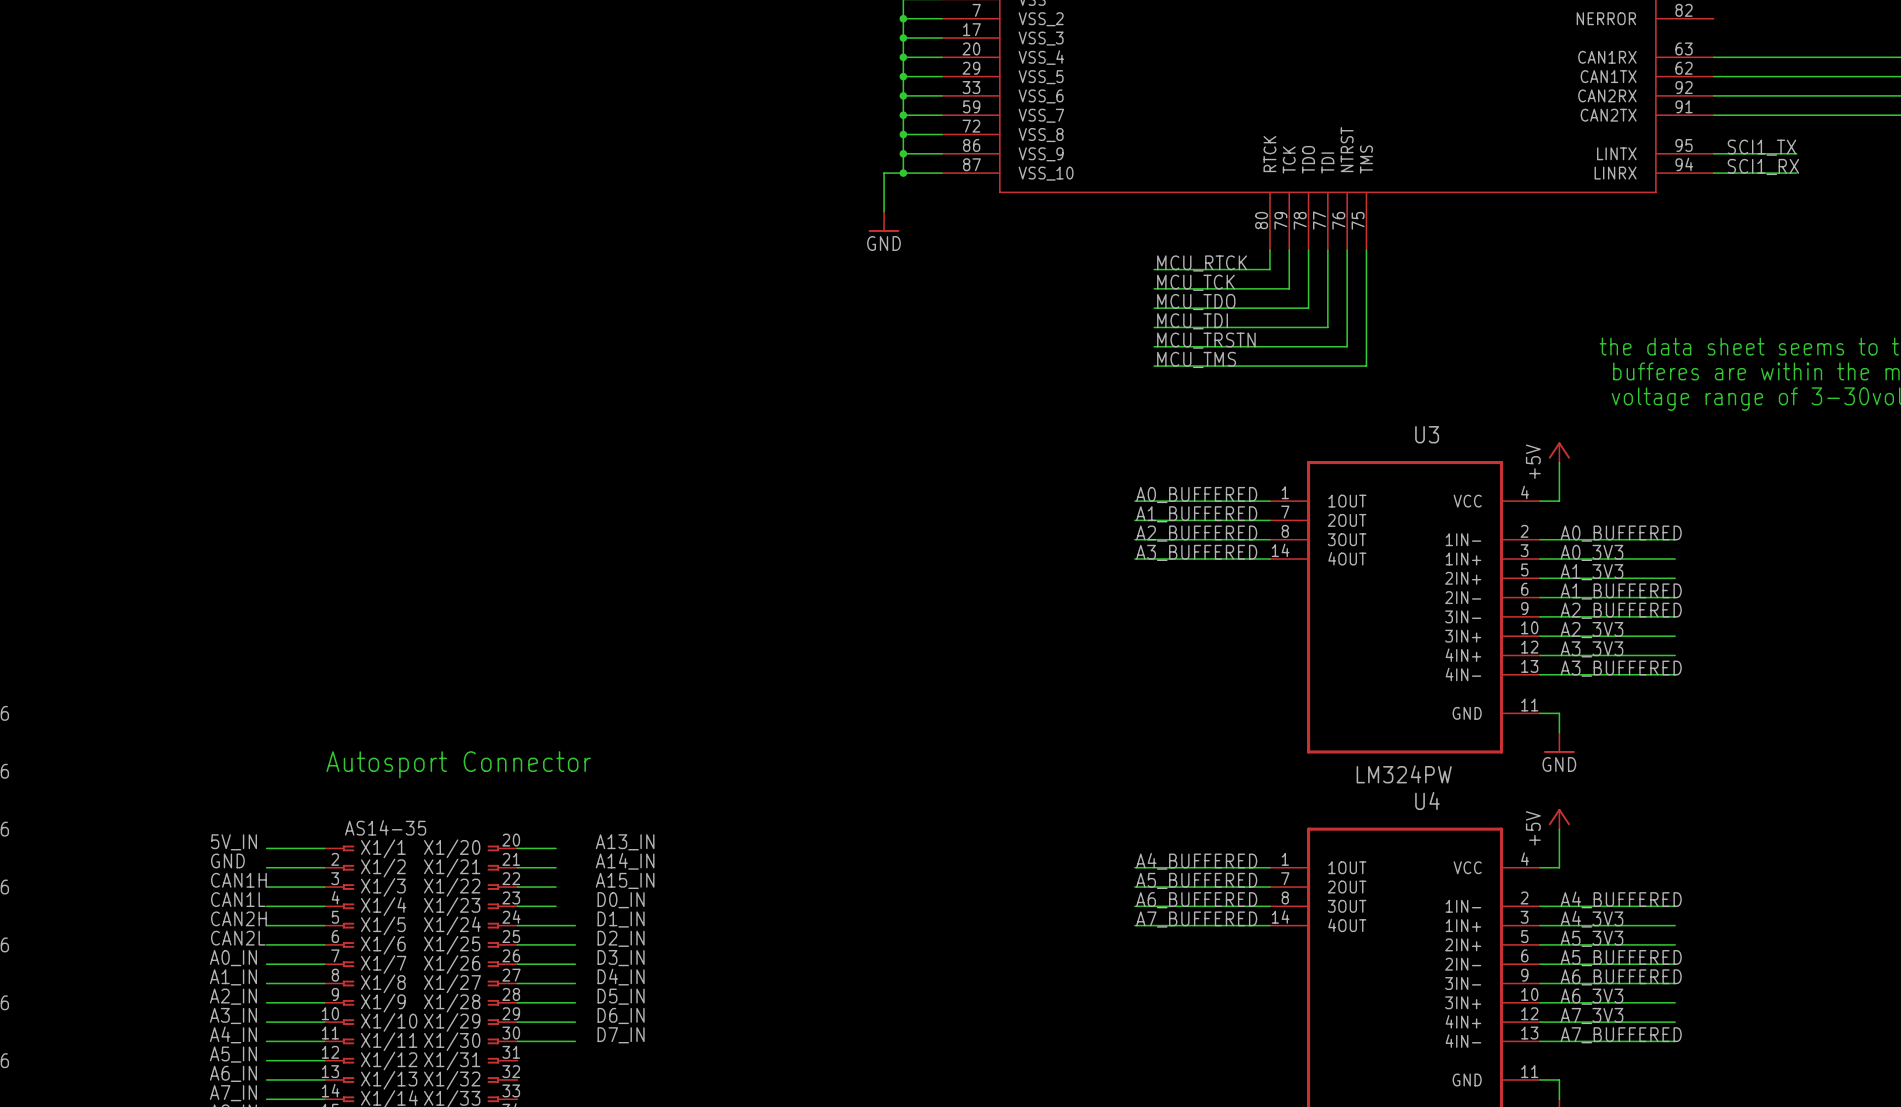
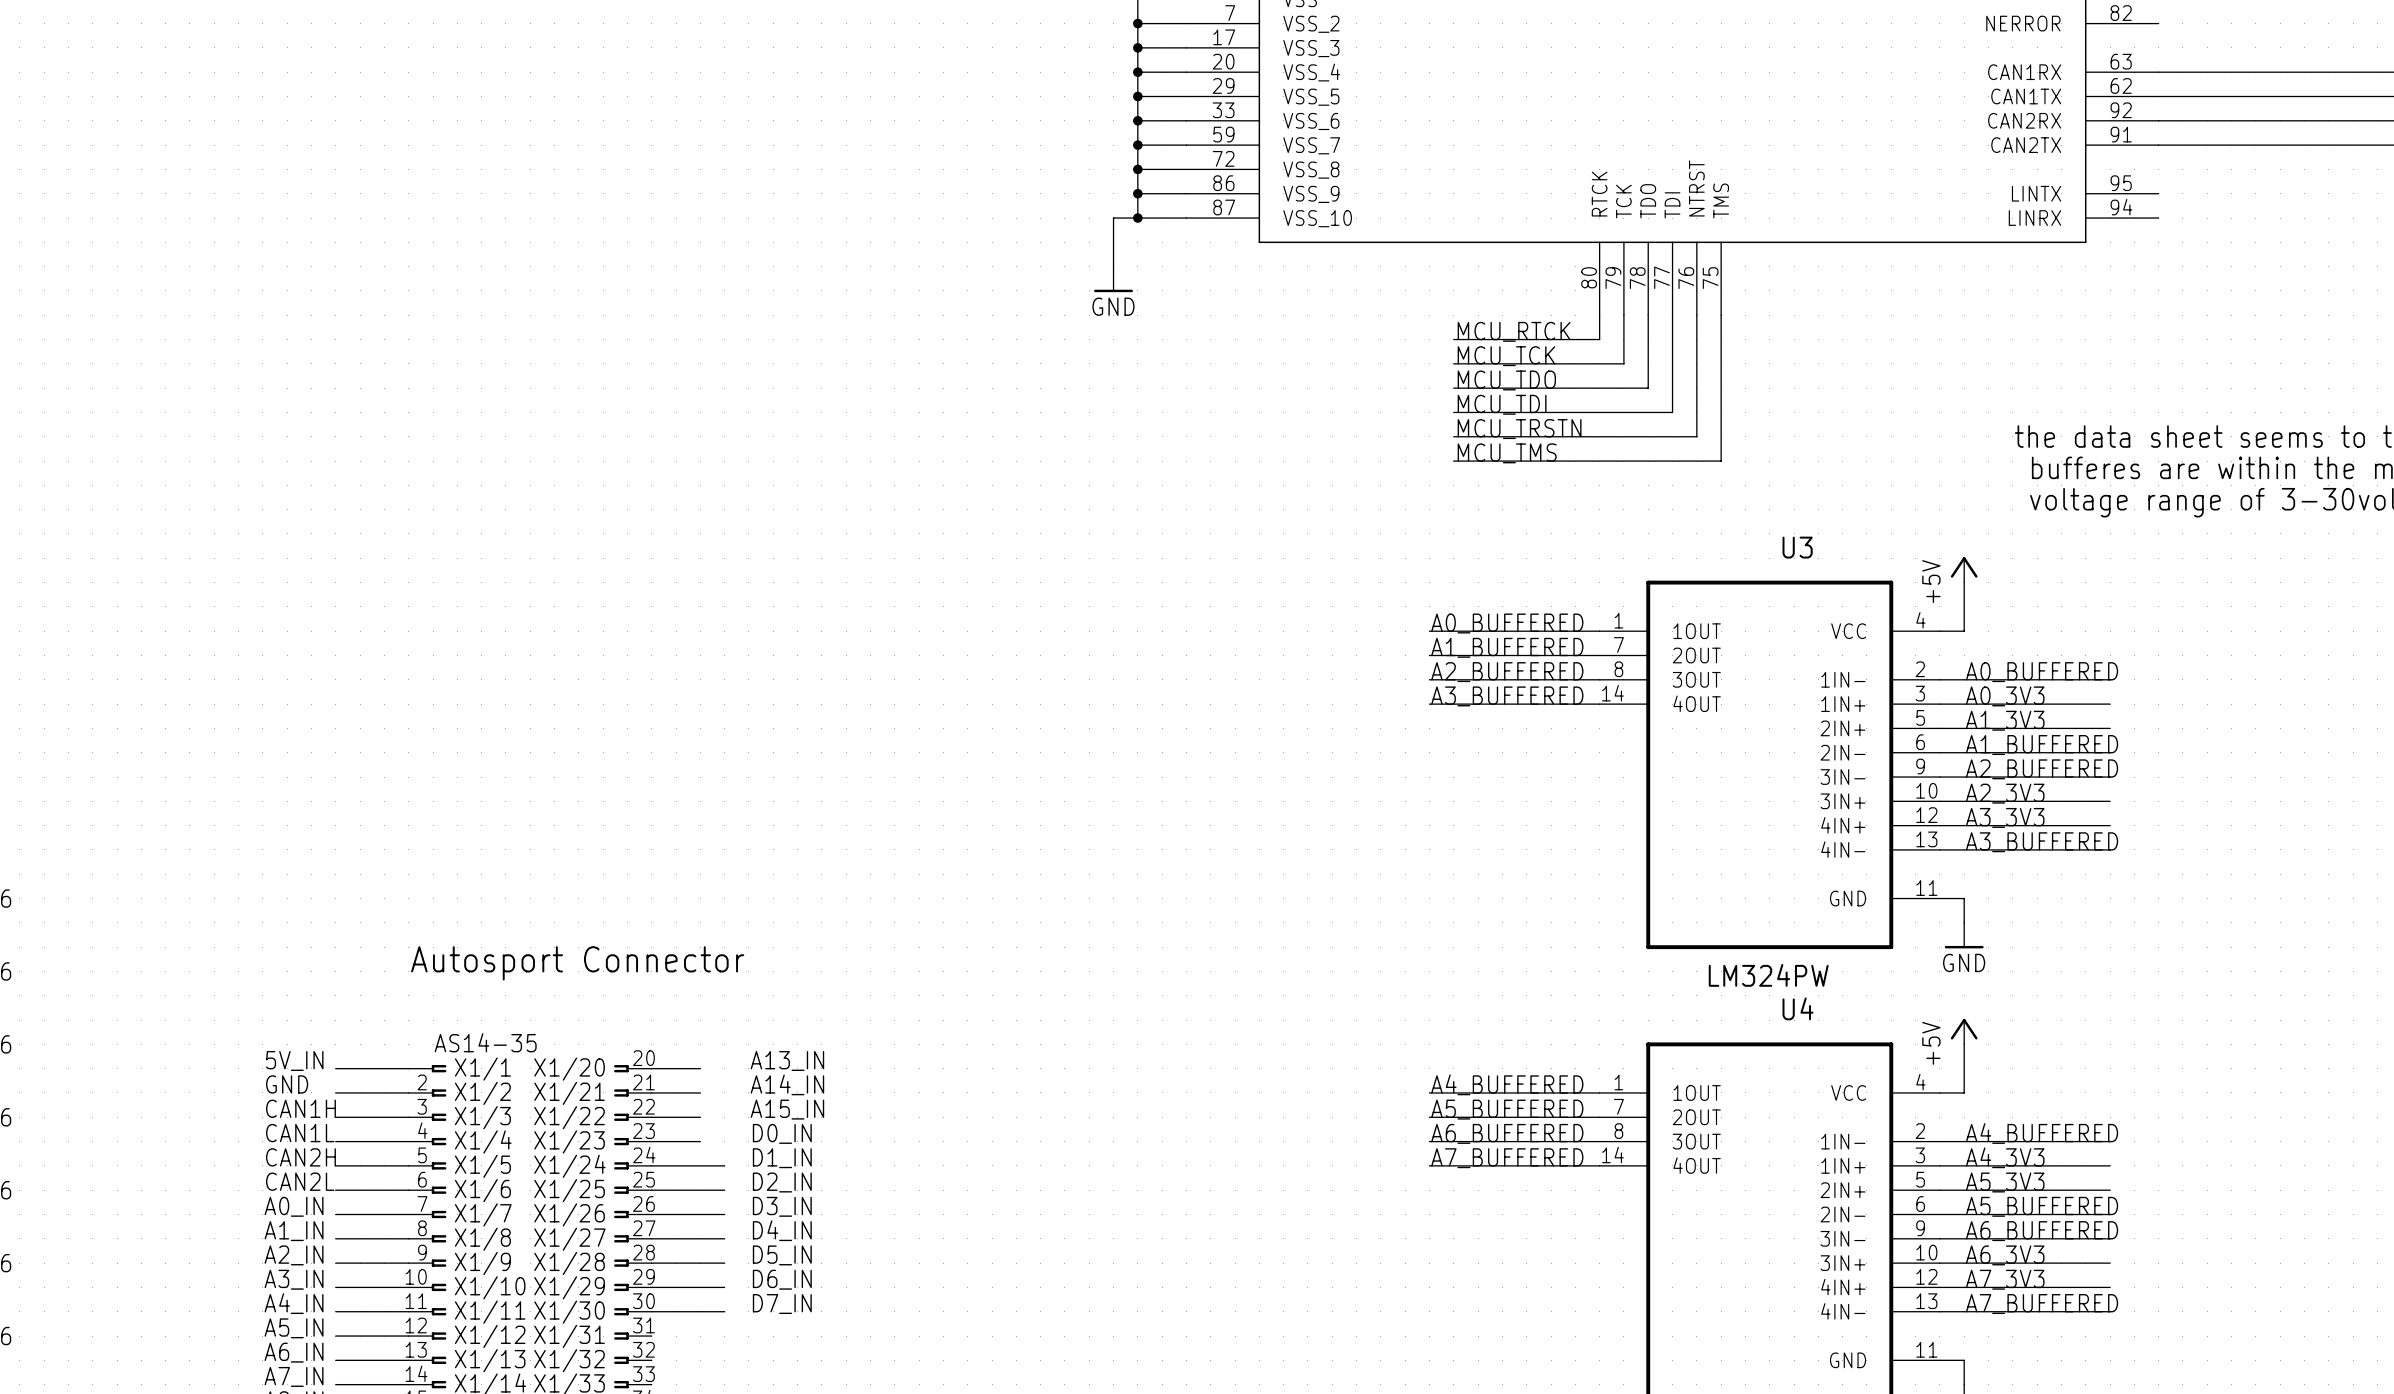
label: SCI1_TX (1761, 147) -> none
wire: (1713, 153) (1796, 153) -> none
label: SCI1_RX (1763, 166) -> none
wire: (1713, 173) (1796, 173) -> none

